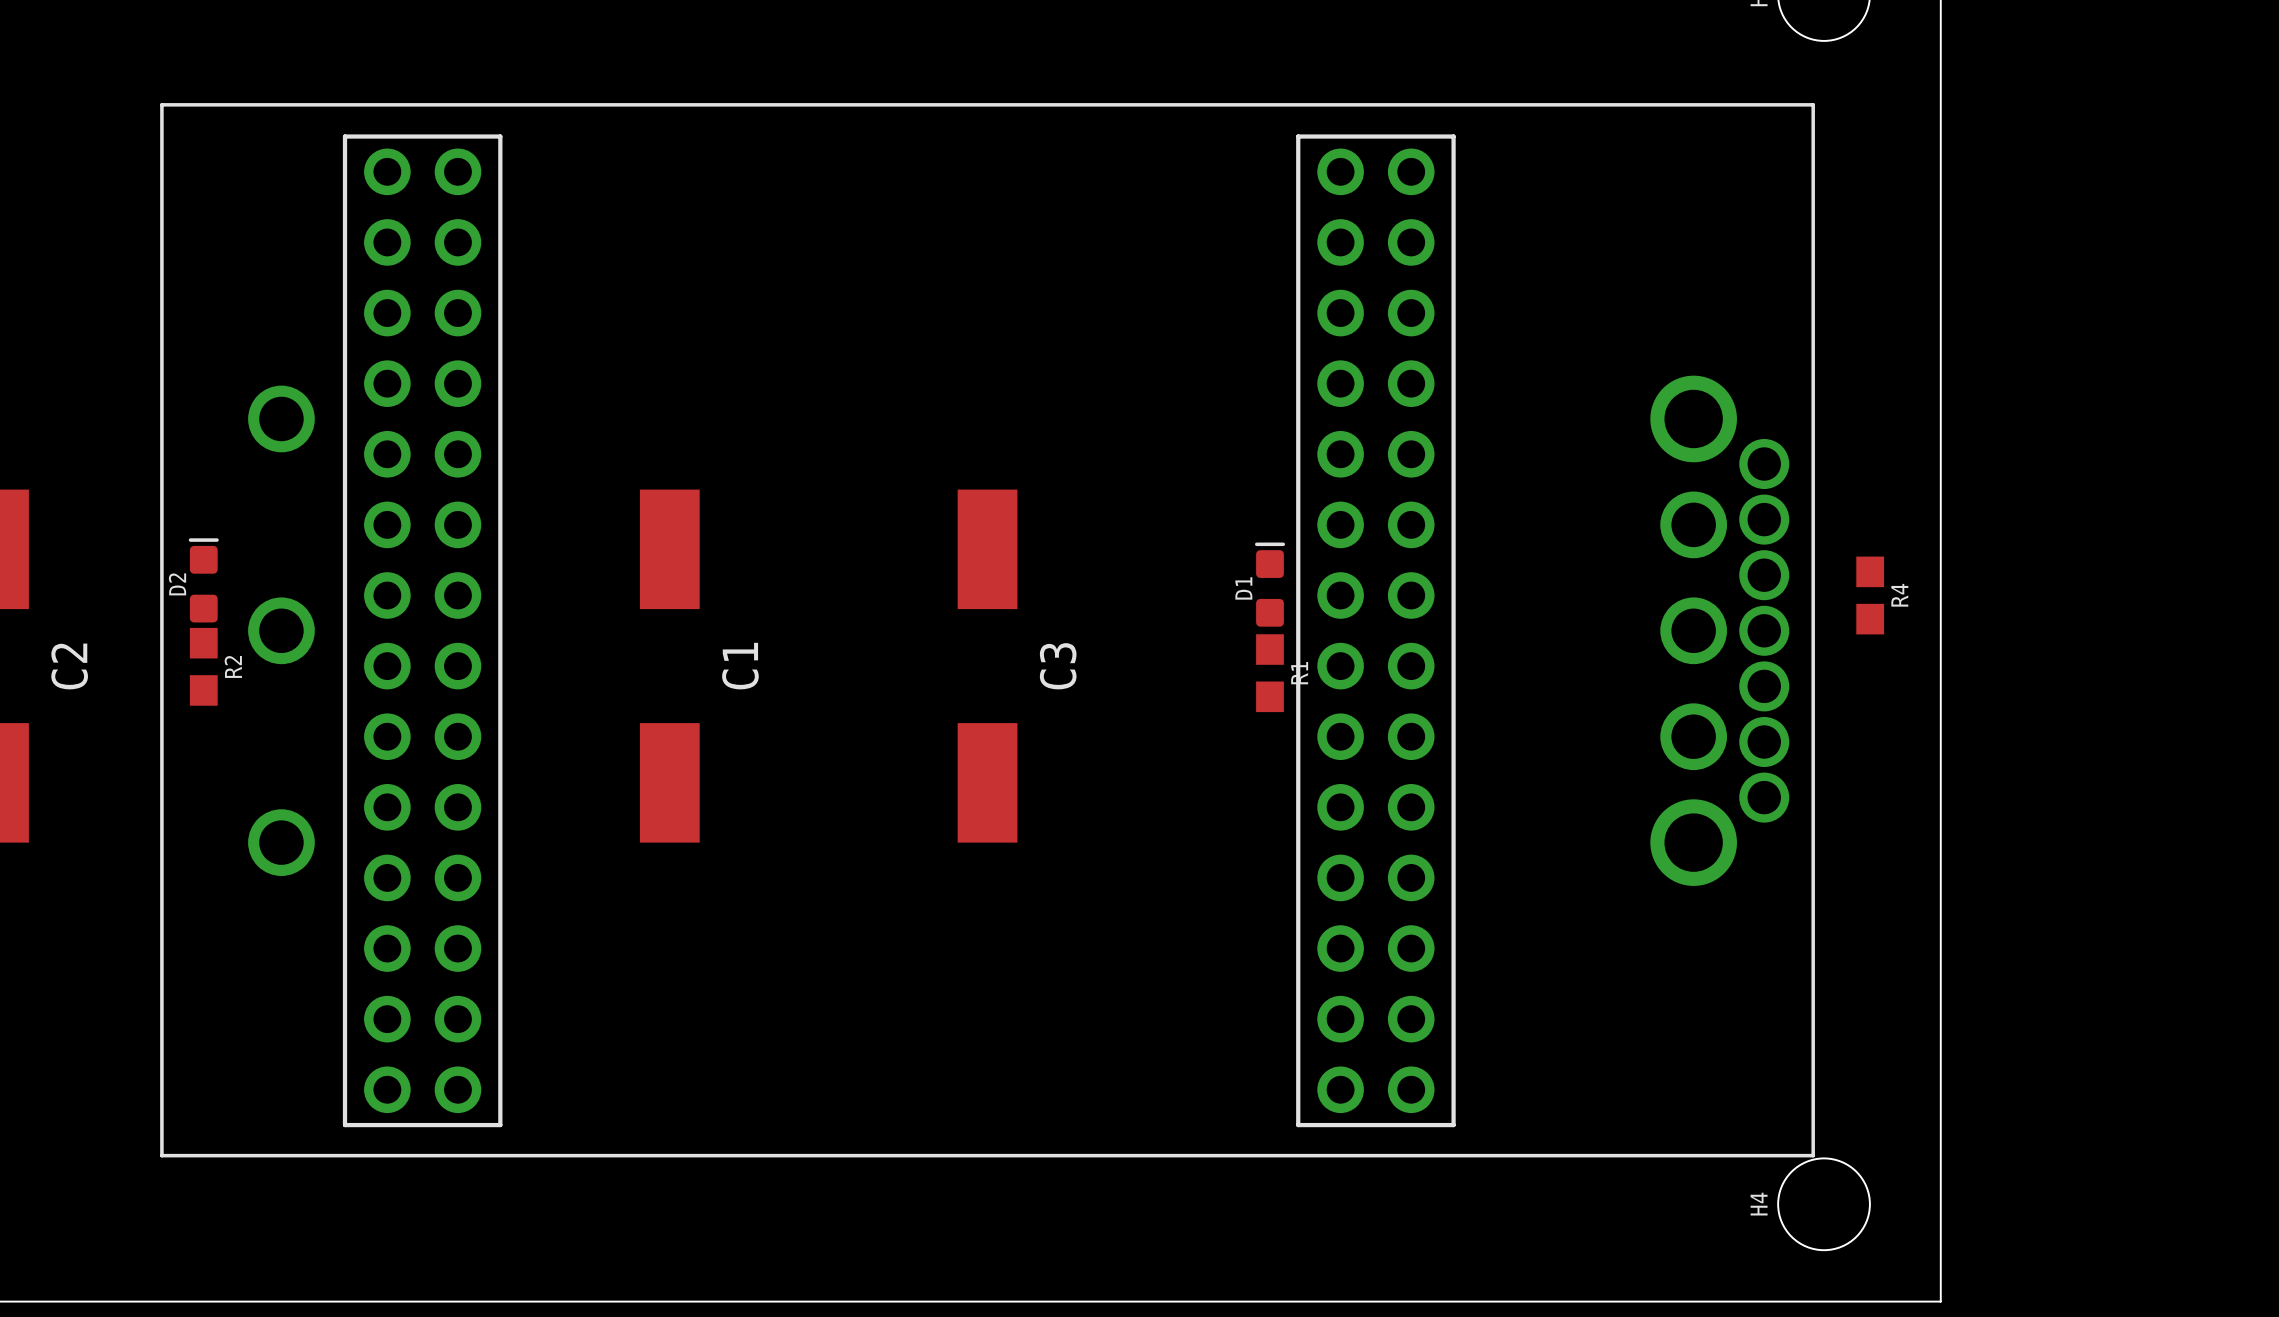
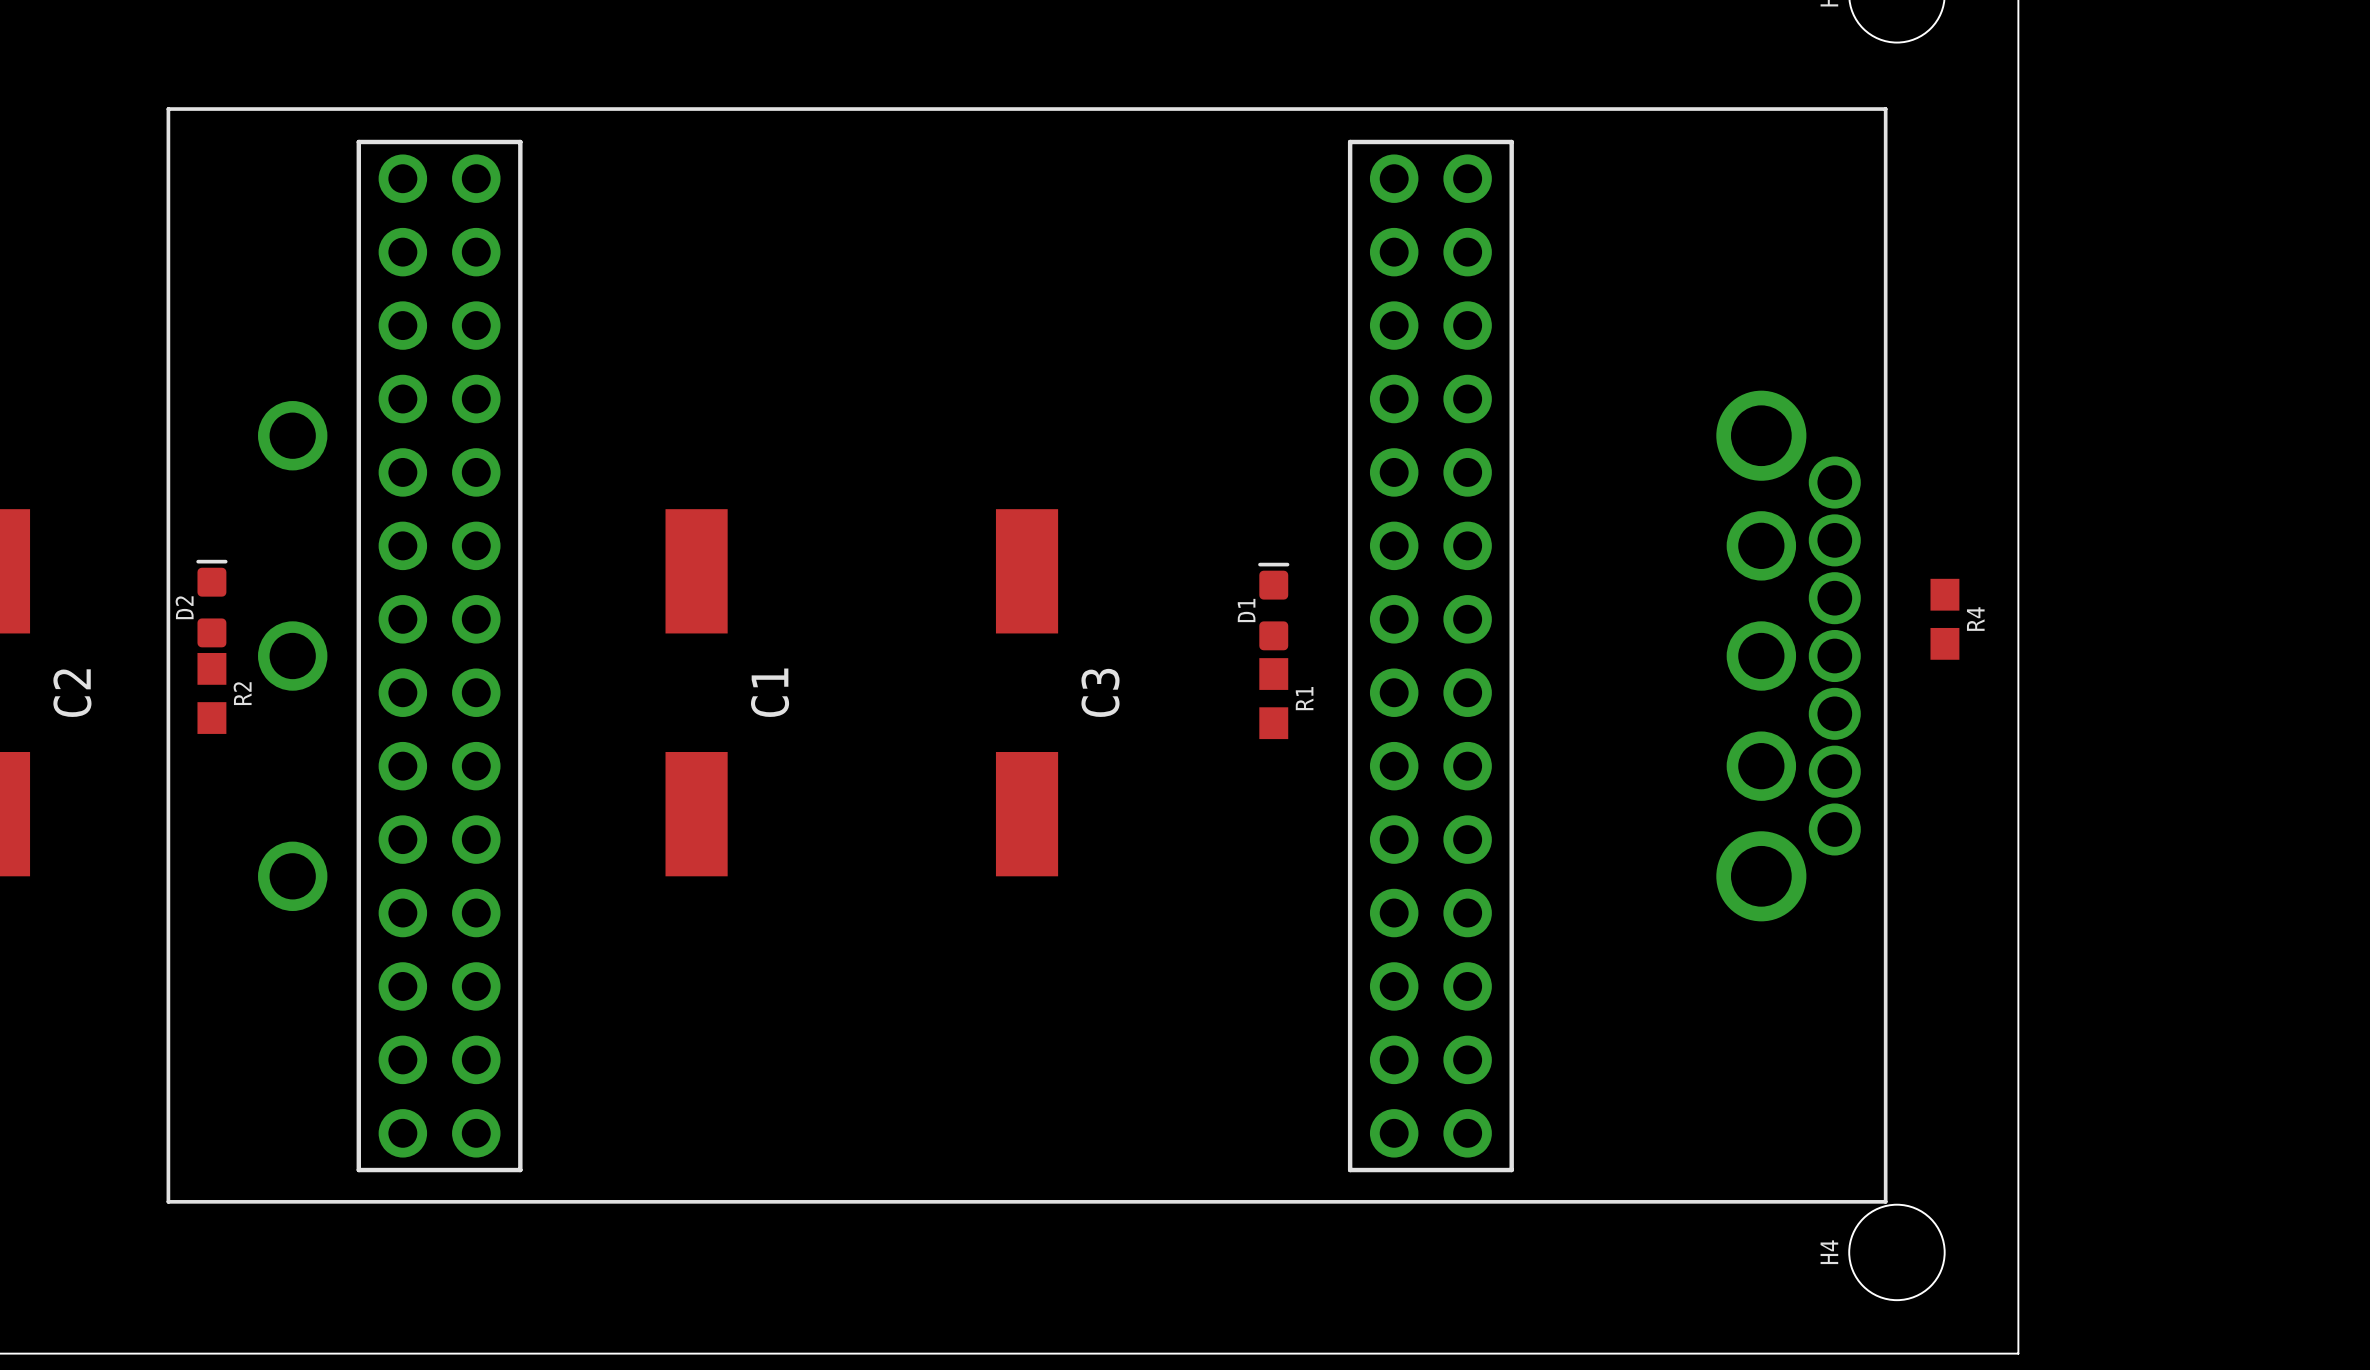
D1 position: (1269, 584) -> (1273, 606)
R1 position: (1269, 673) -> (1273, 698)

